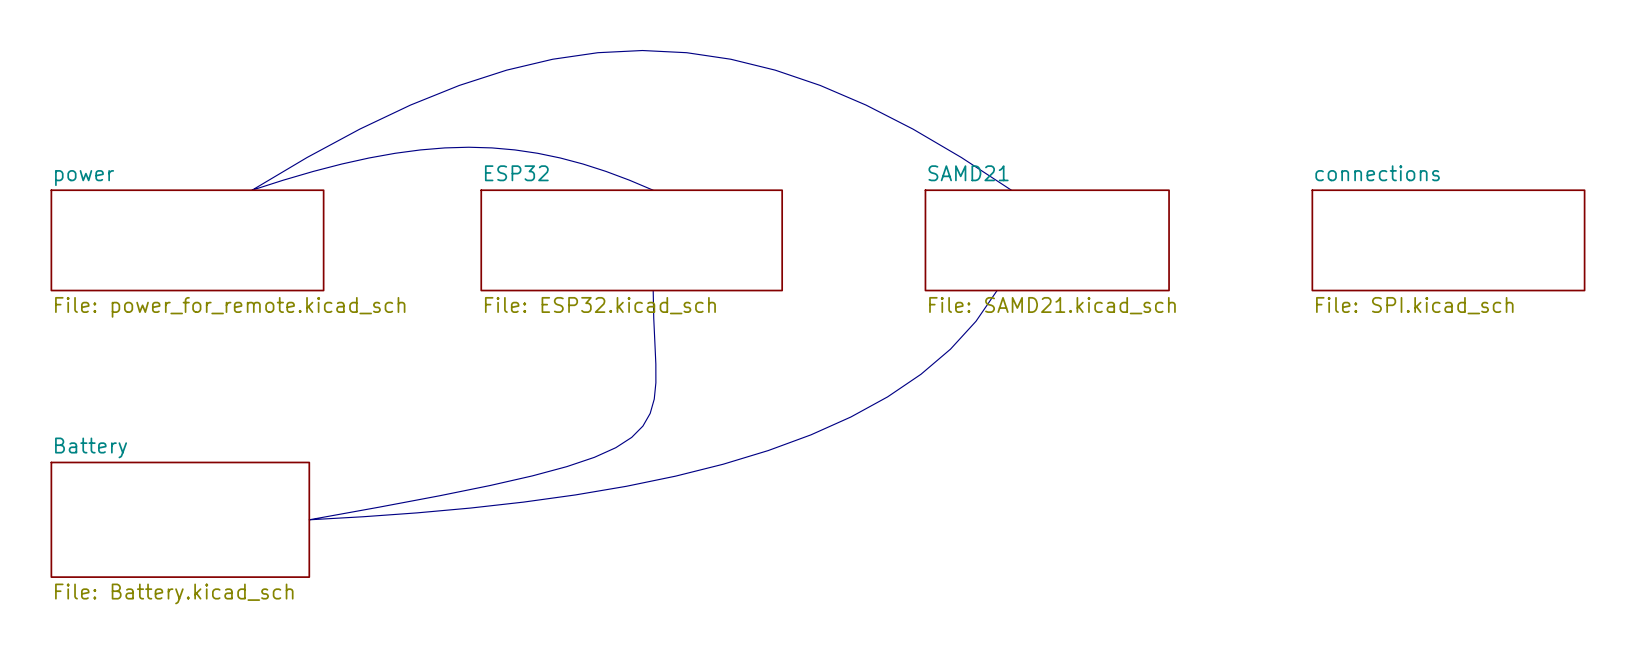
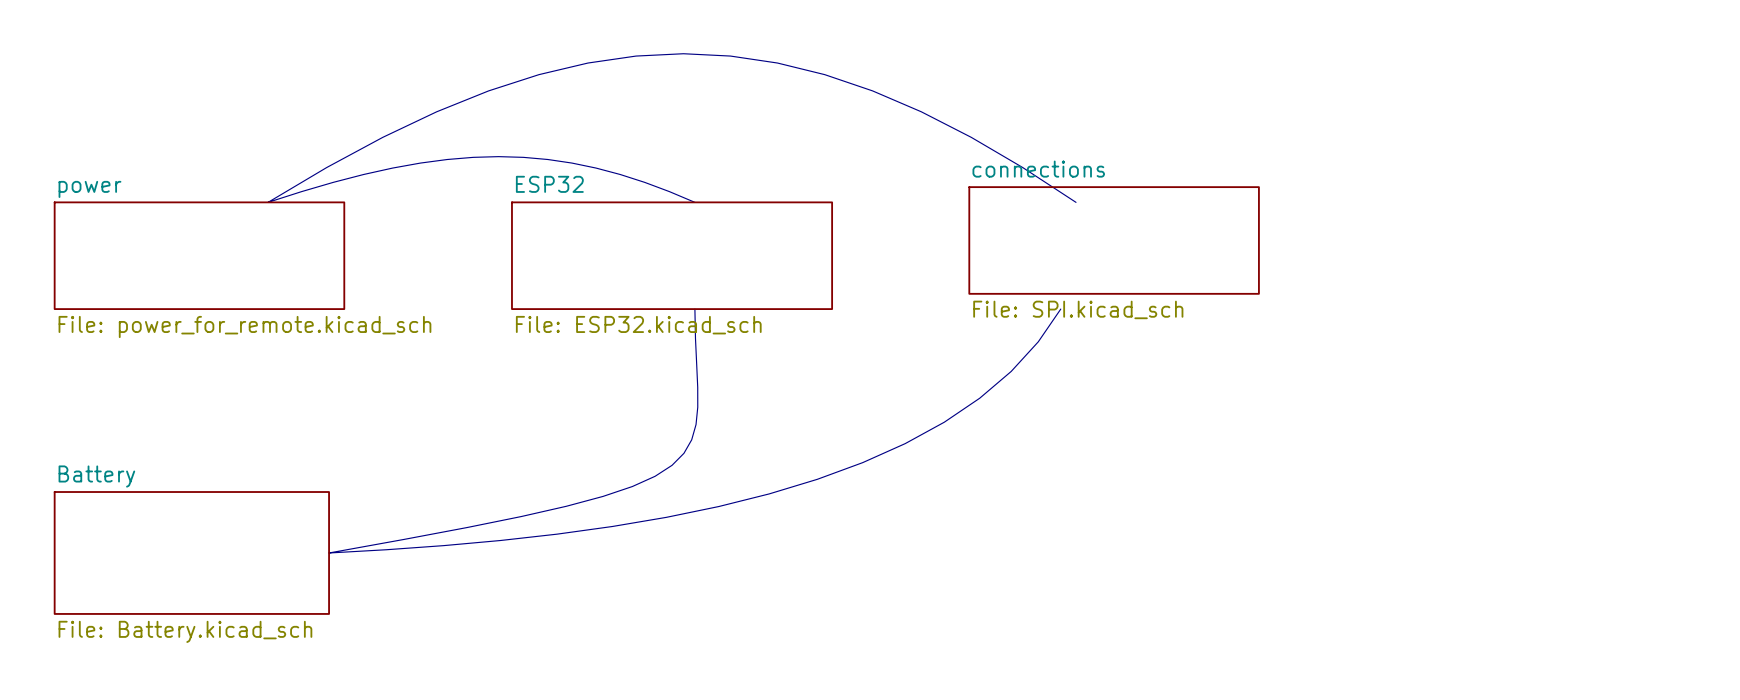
sheet connections: none -> File: SPI.kicad_sch (1114, 240)
sheet SAMD21: File: SAMD21.kicad_sch (1047, 240) -> none
sheet connections: File: SPI.kicad_sch (1448, 240) -> none

